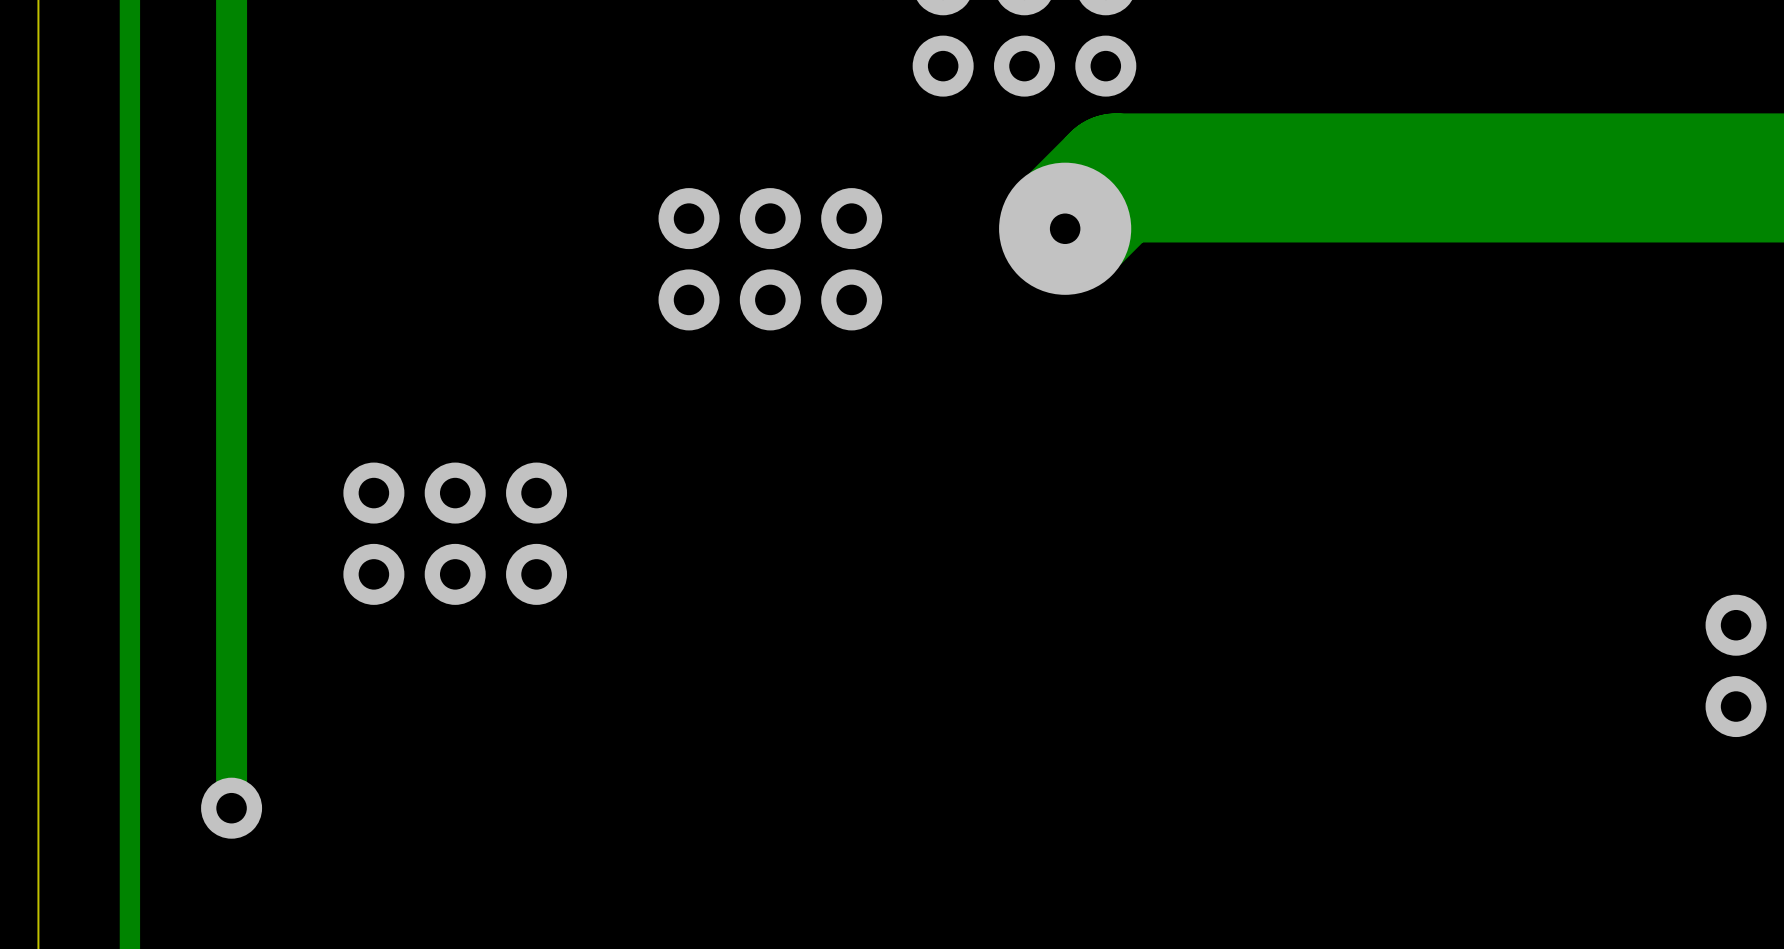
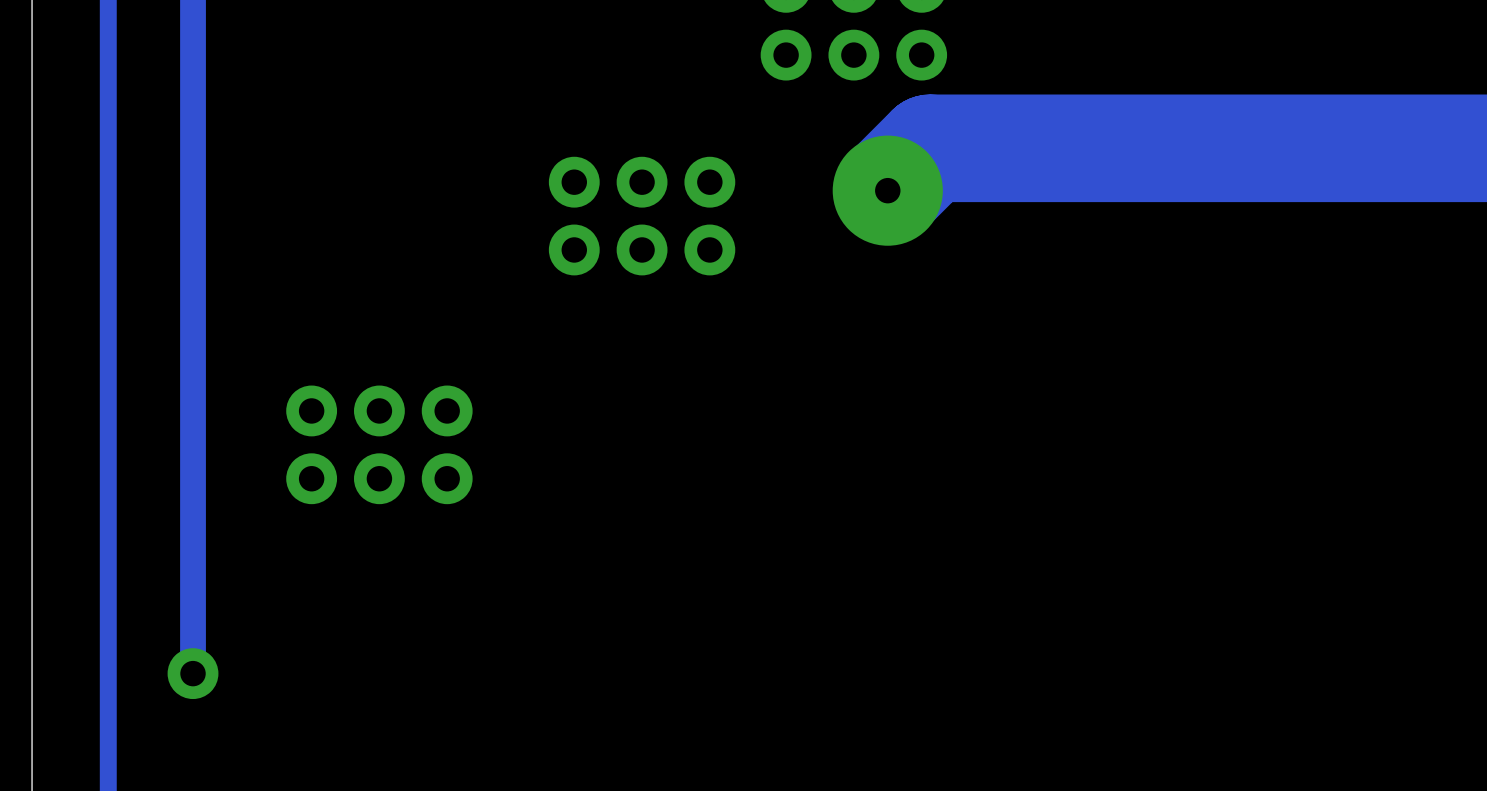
via: (1736, 625) -> none
via: (1736, 706) -> none

